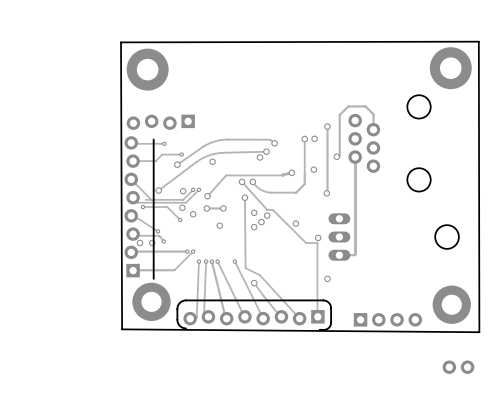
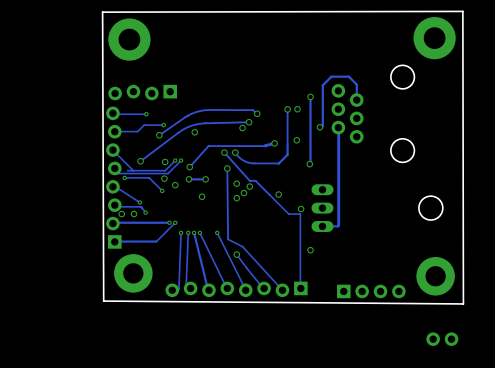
line: (153, 139) (153, 278) -> none
line: (186, 328) (180, 326) (177, 320) (177, 306) (183, 300) (324, 300) (330, 306) (331, 323) (327, 328) (319, 329) -> none

